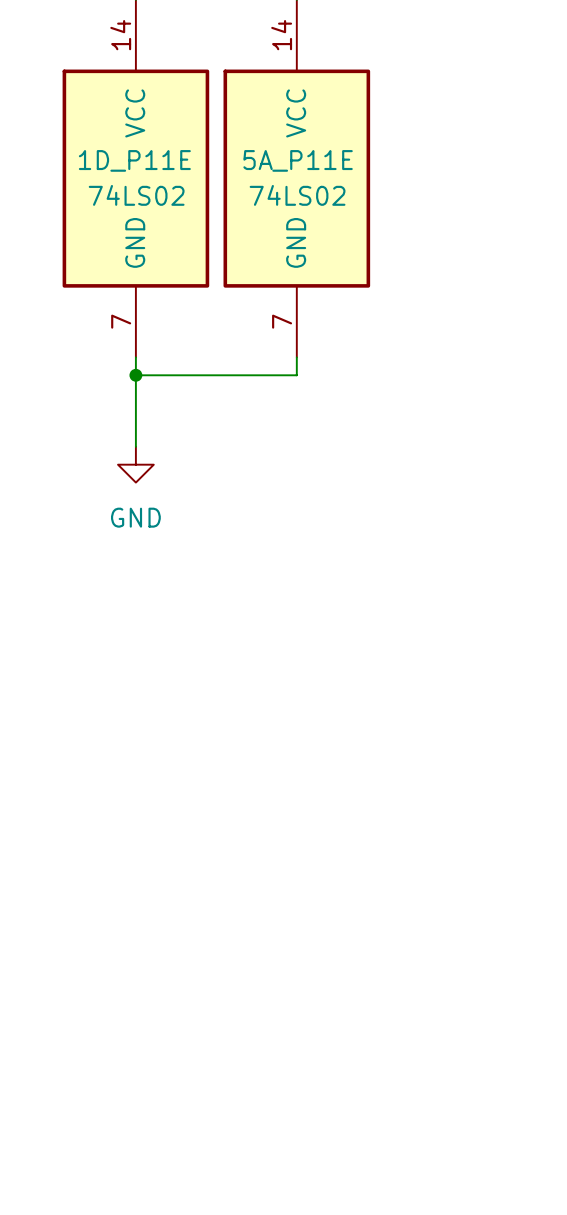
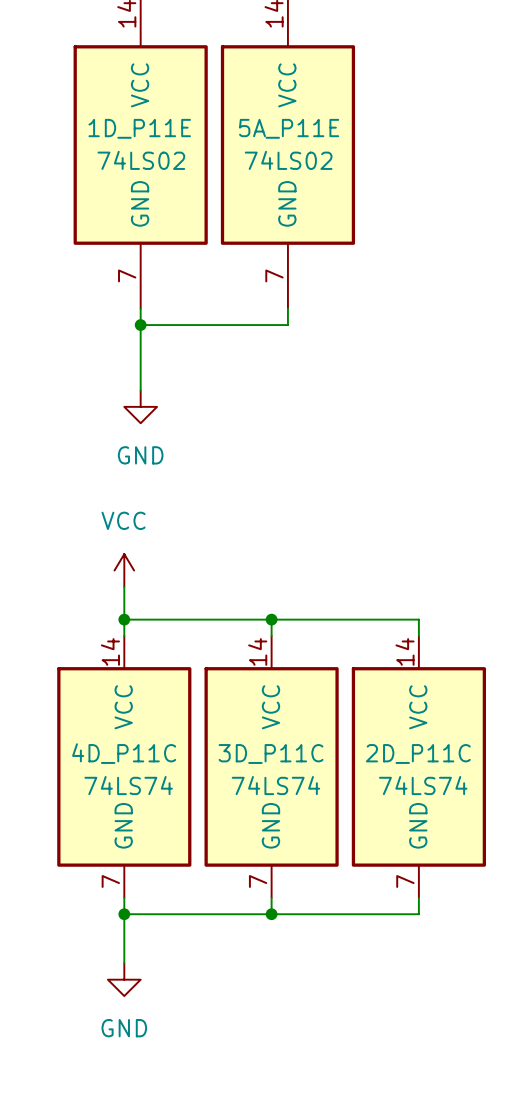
power symbol: none -> VCC (124, 570)
wire: none -> (124, 586) (124, 636)
wire: none -> (124, 619) (418, 619) (418, 636)
junction: none -> (124, 619)
wire: none -> (271, 619) (271, 636)
junction: none -> (271, 619)
4D_P11C: none -> 74LS74 (124, 766)
3D_P11C: none -> 74LS74 (271, 766)
2D_P11C: none -> 74LS74 (418, 766)
wire: none -> (124, 897) (124, 963)
wire: none -> (271, 897) (271, 914)
wire: none -> (418, 897) (418, 914) (124, 914)
junction: none -> (124, 914)
junction: none -> (271, 914)
power symbol: none -> GND (124, 979)

